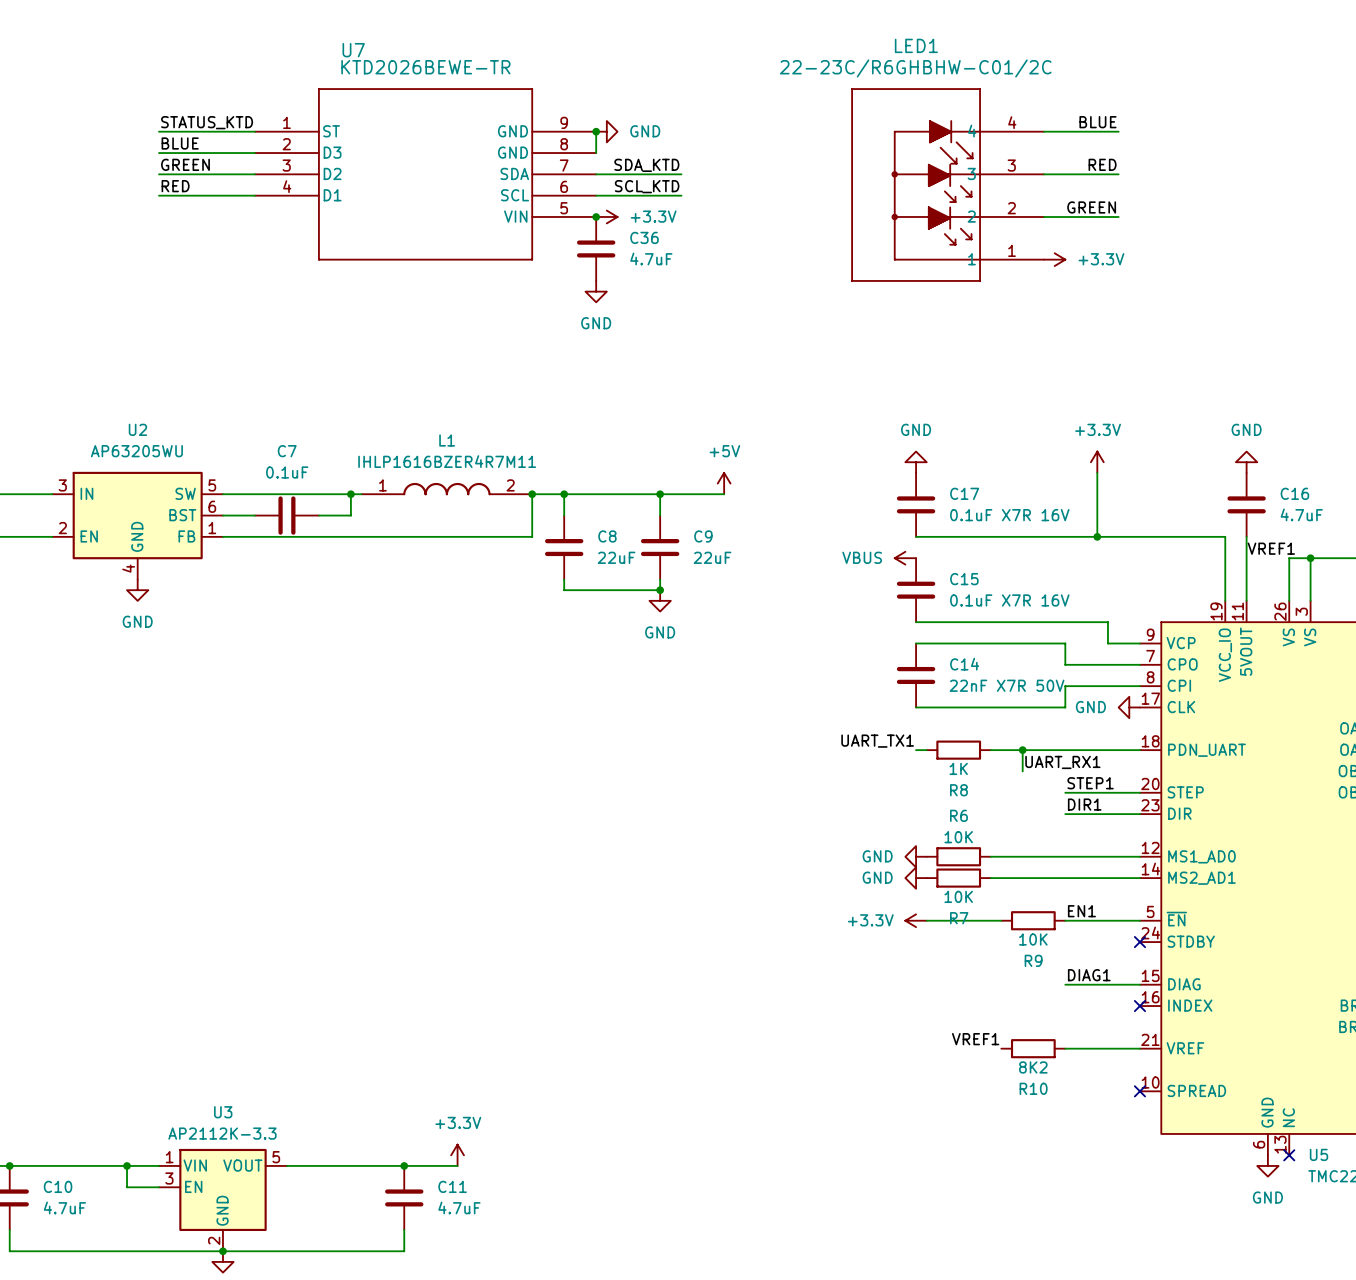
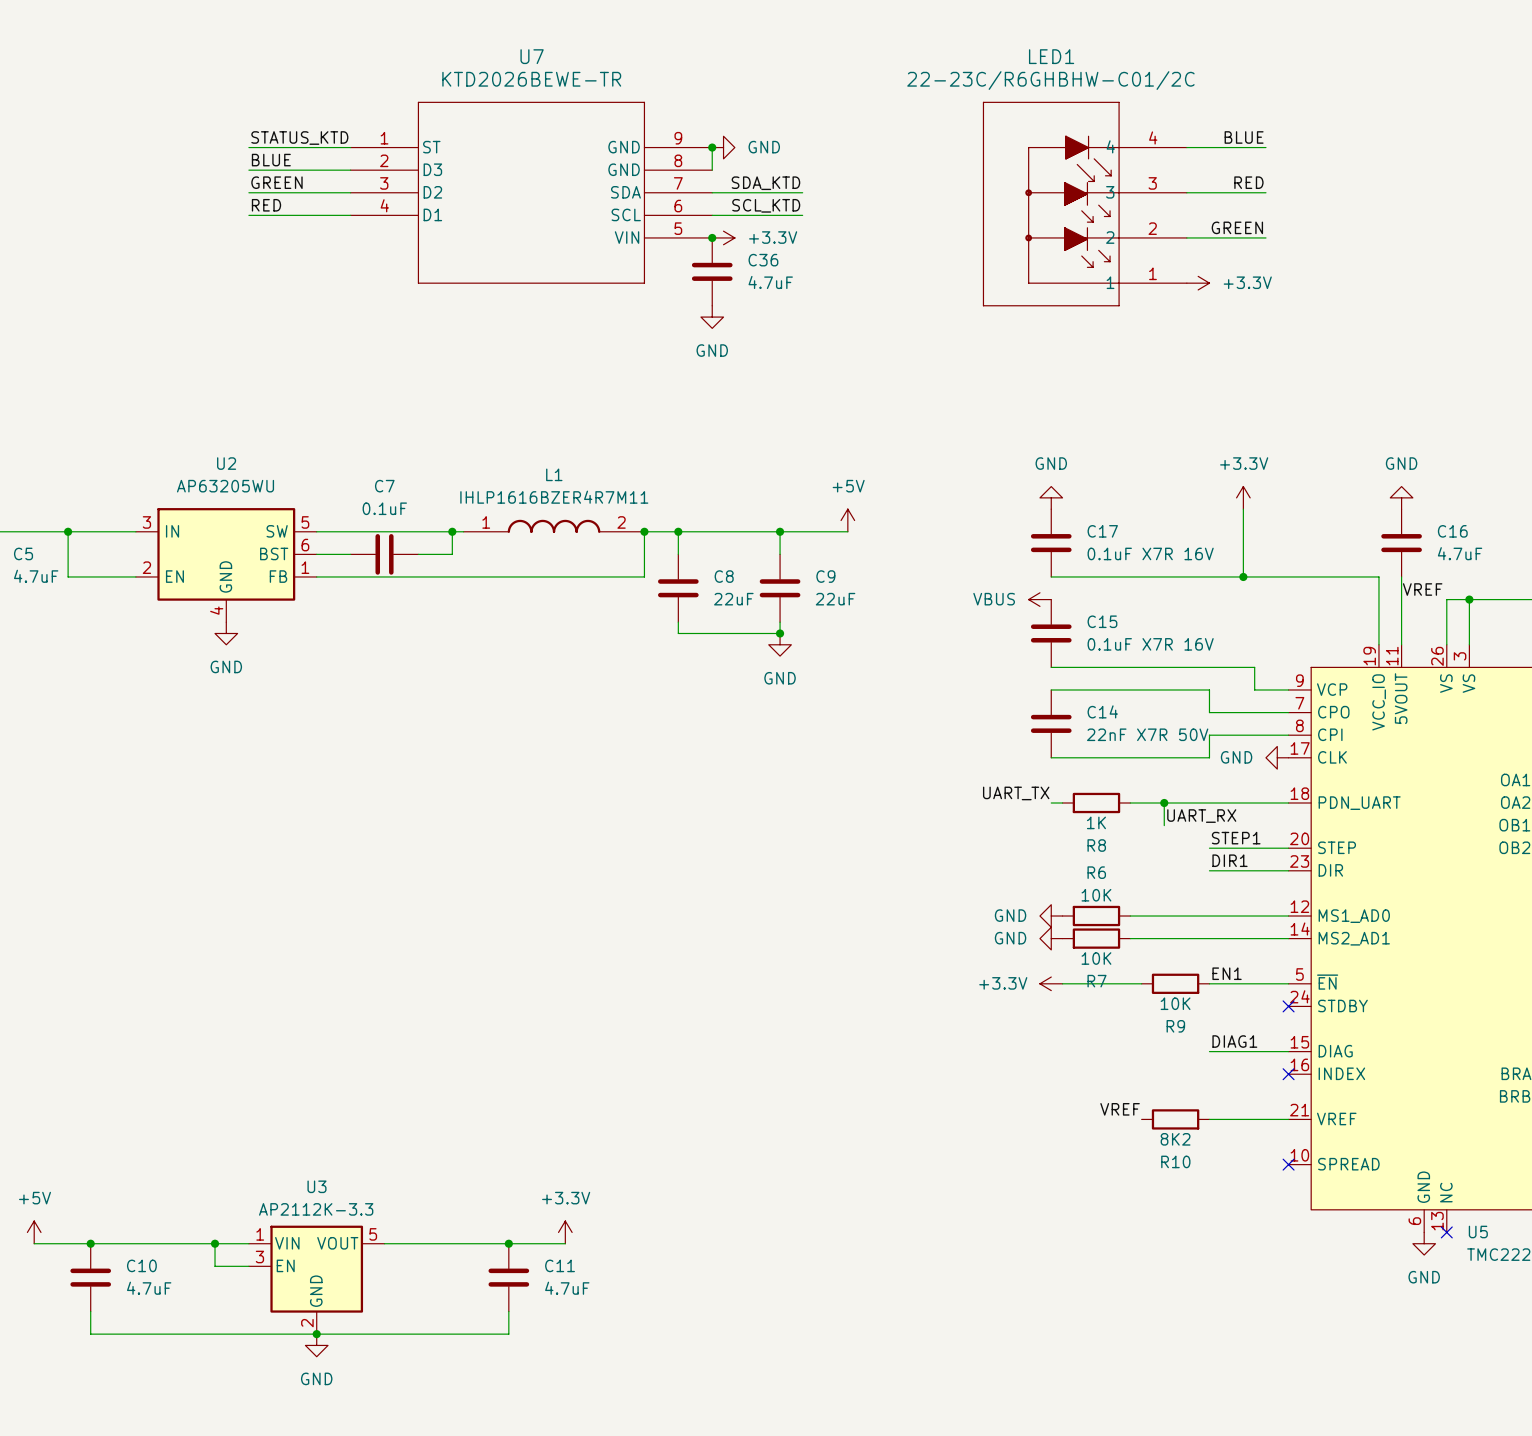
U7 name position: U7 (353, 50) -> U7 (532, 56)
label: VREF1 (1271, 548) -> VREF (1422, 589)
label: UART_TX1 (877, 741) -> UART_TX (1016, 793)
label: UART_RX1 (1062, 762) -> UART_RX (1201, 816)
label: VREF1 (975, 1039) -> VREF (1120, 1109)

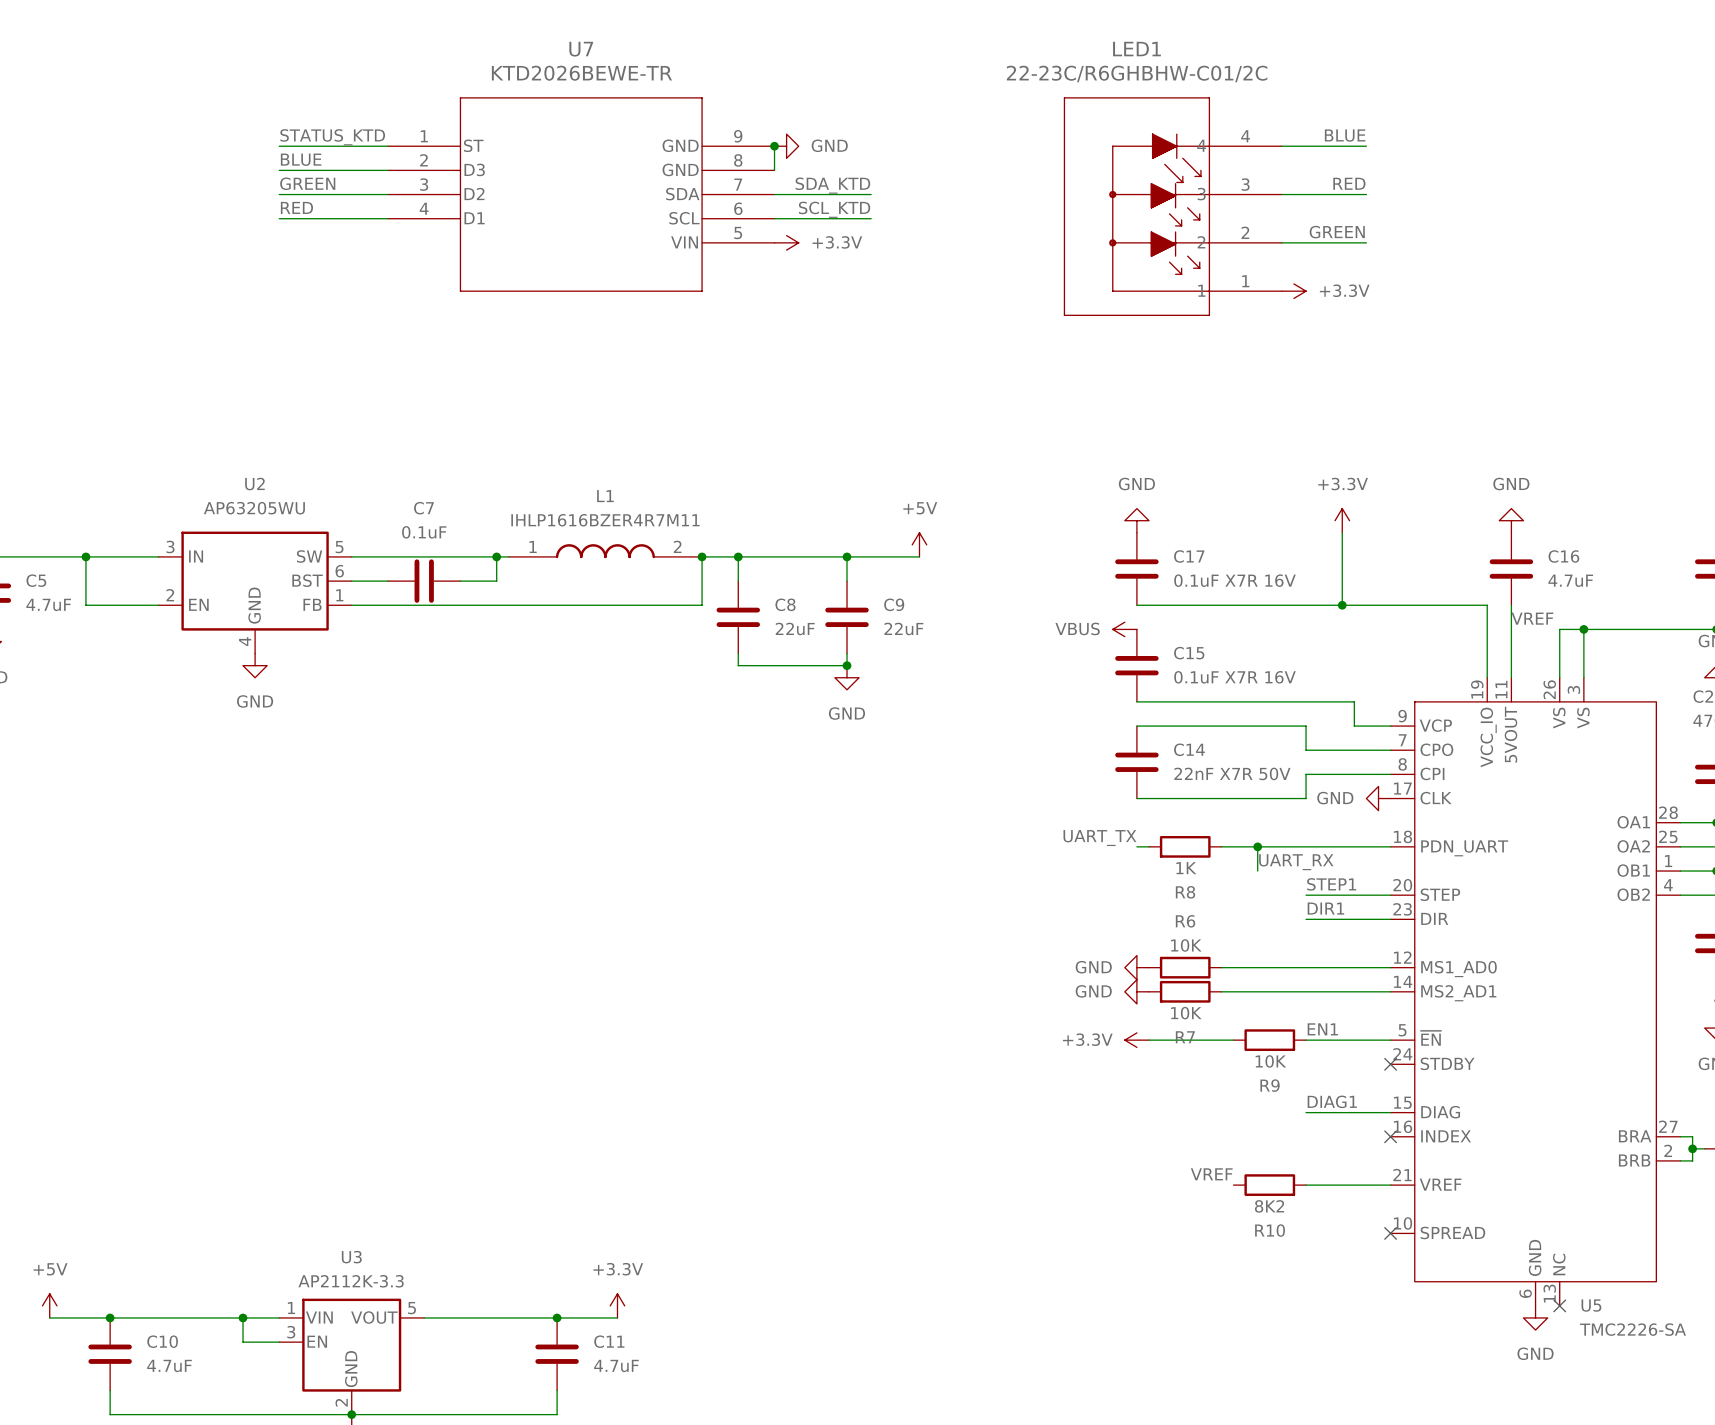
junction: (712, 237) -> none
C36: 4.7uF (712, 271) -> none
power symbol: GND (712, 317) -> none

